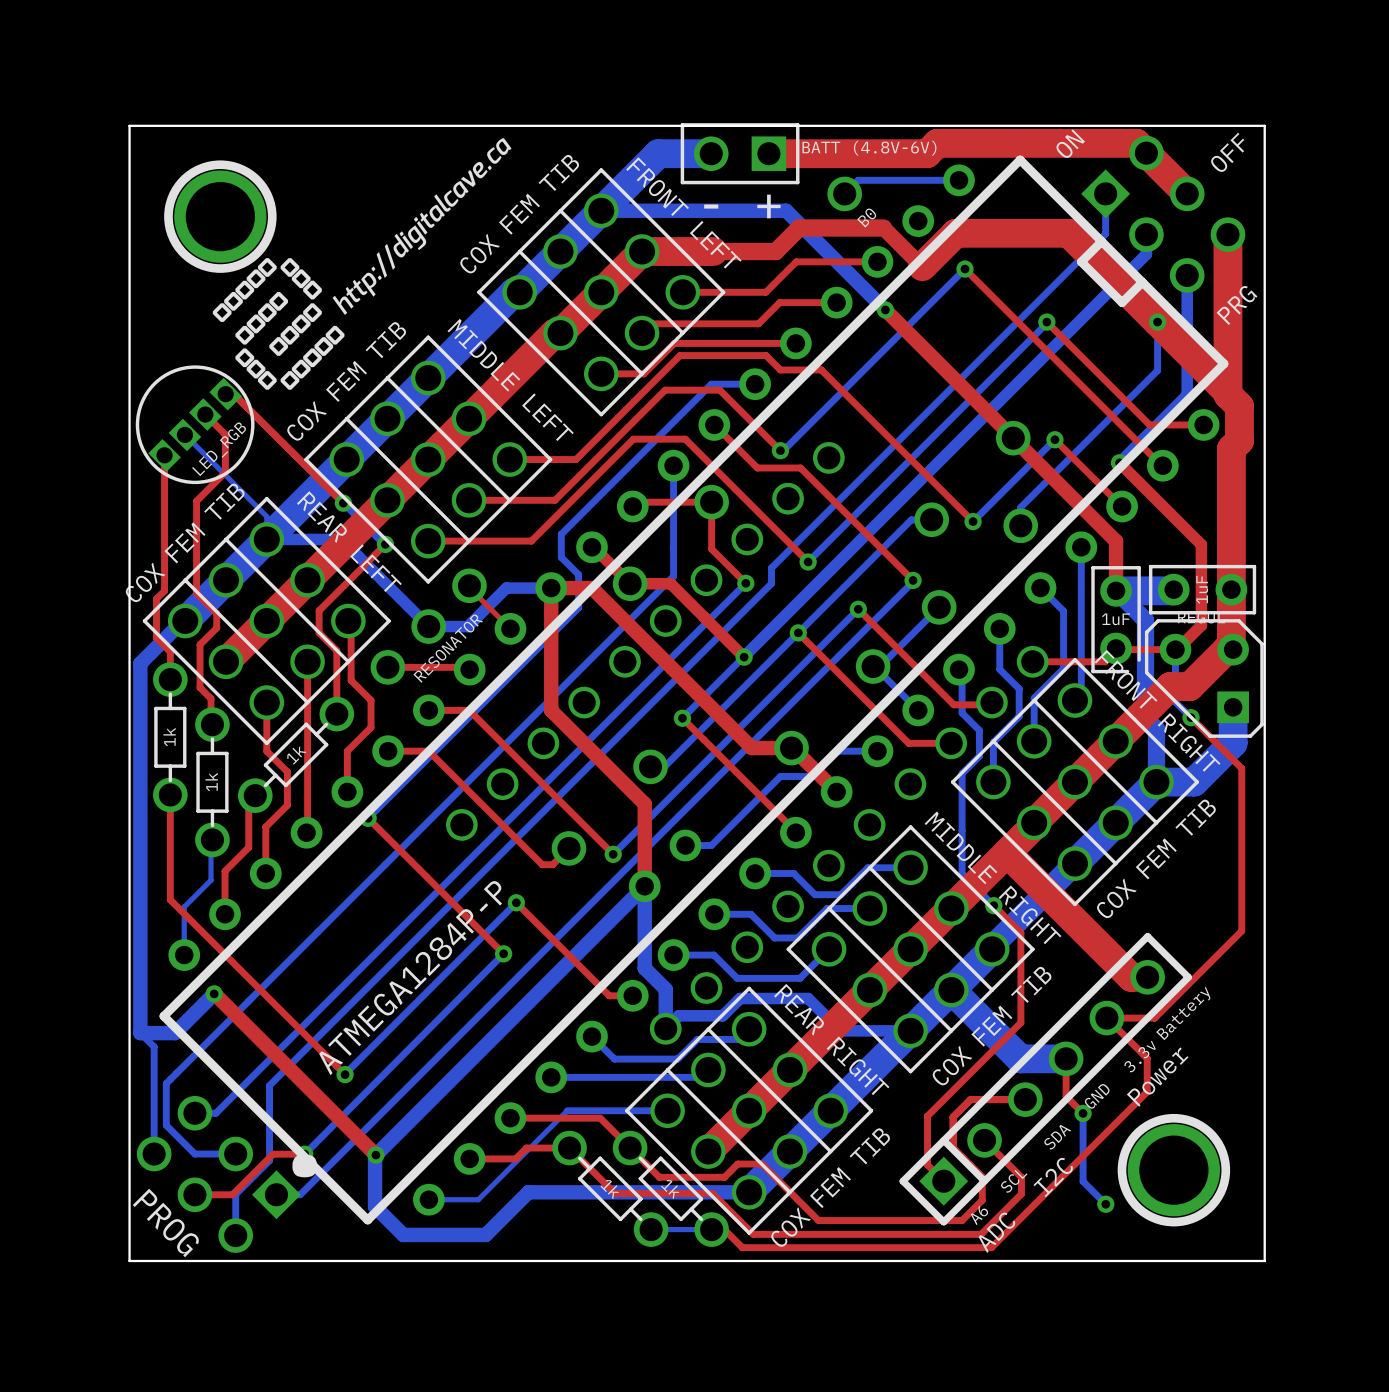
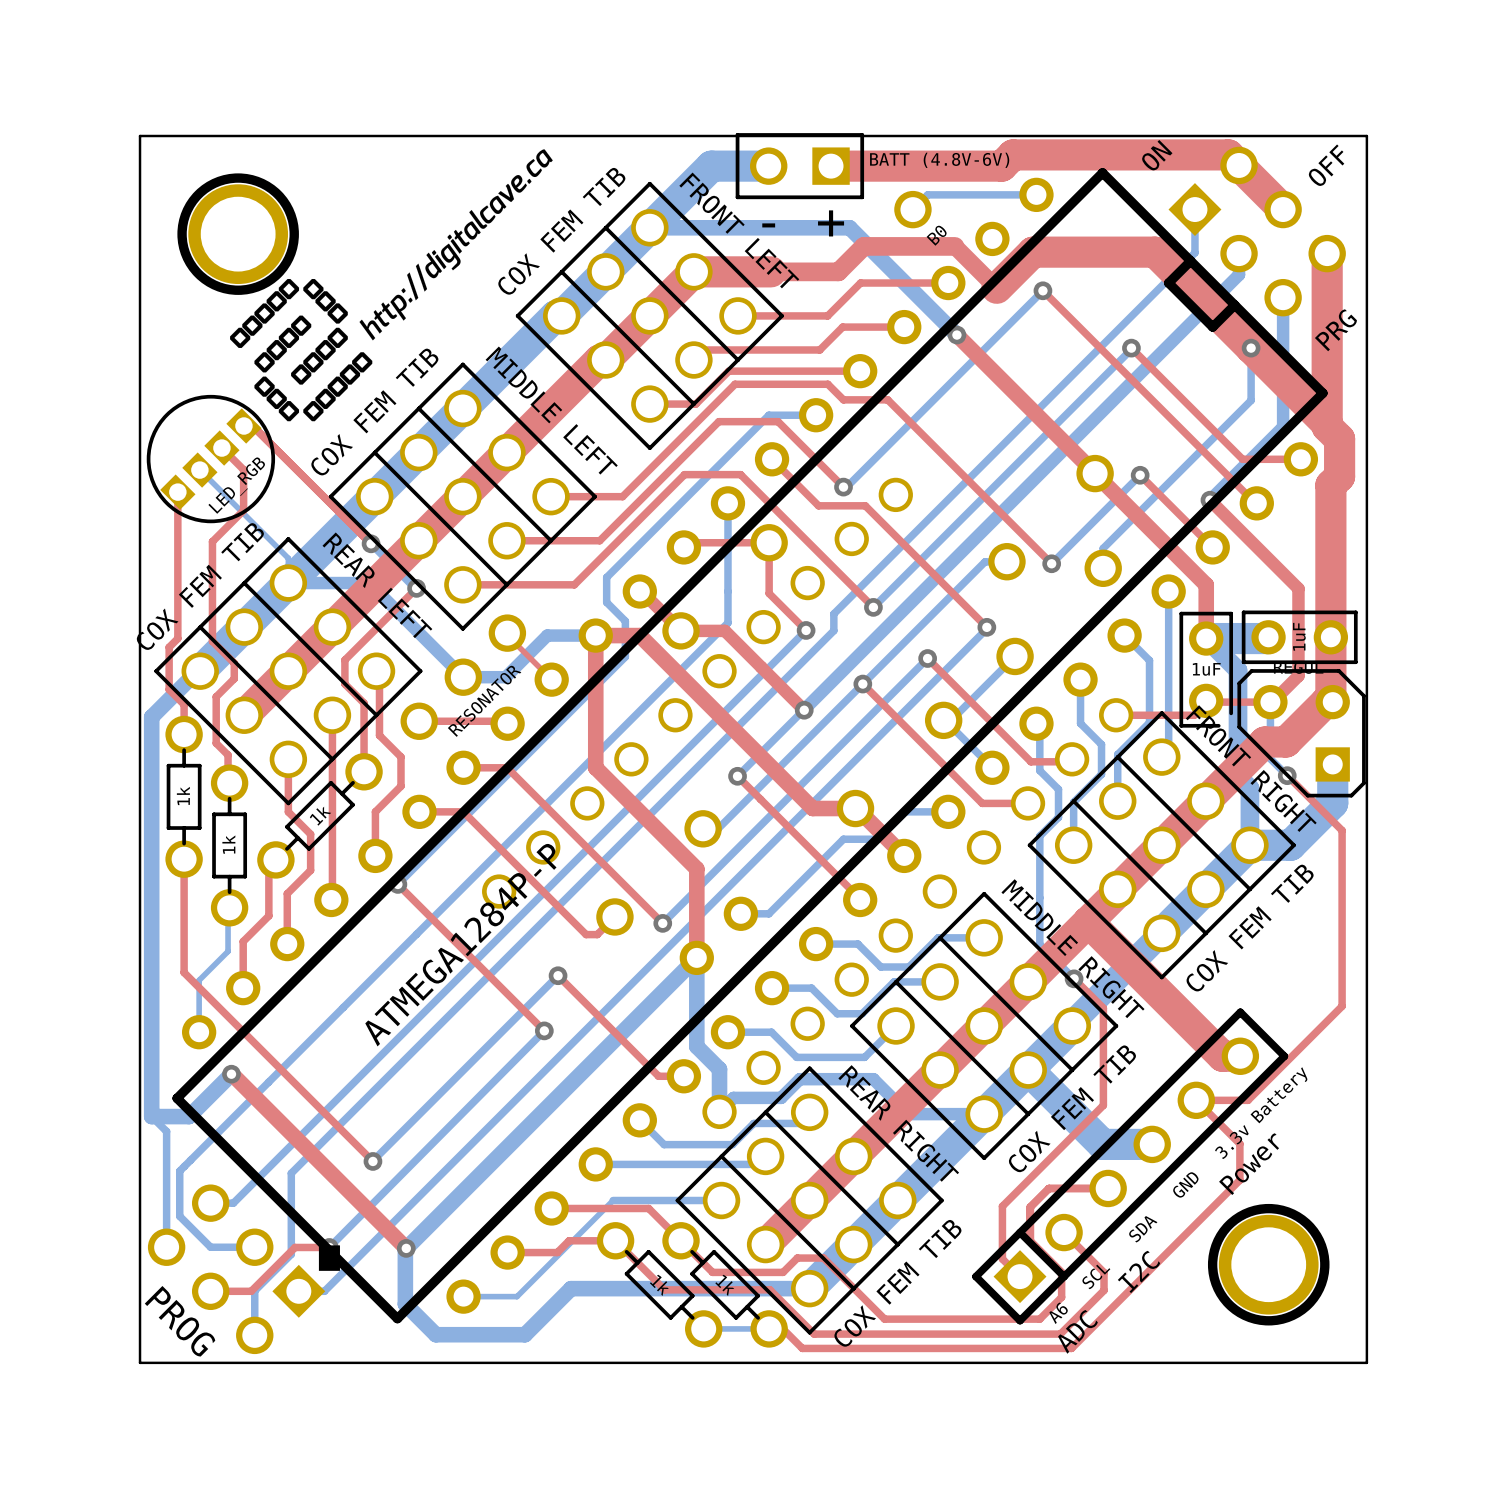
part value position: ATMEGA1284P-P (410, 978) -> ATMEGA1284P-P (460, 945)
top track: (1066, 1058) (1066, 1096) (1083, 1113) -> none
bottom track: (1083, 1113) (1083, 1181) (1105, 1204) -> none
via: (1083, 1113) -> none
via: (1105, 1204) -> none

